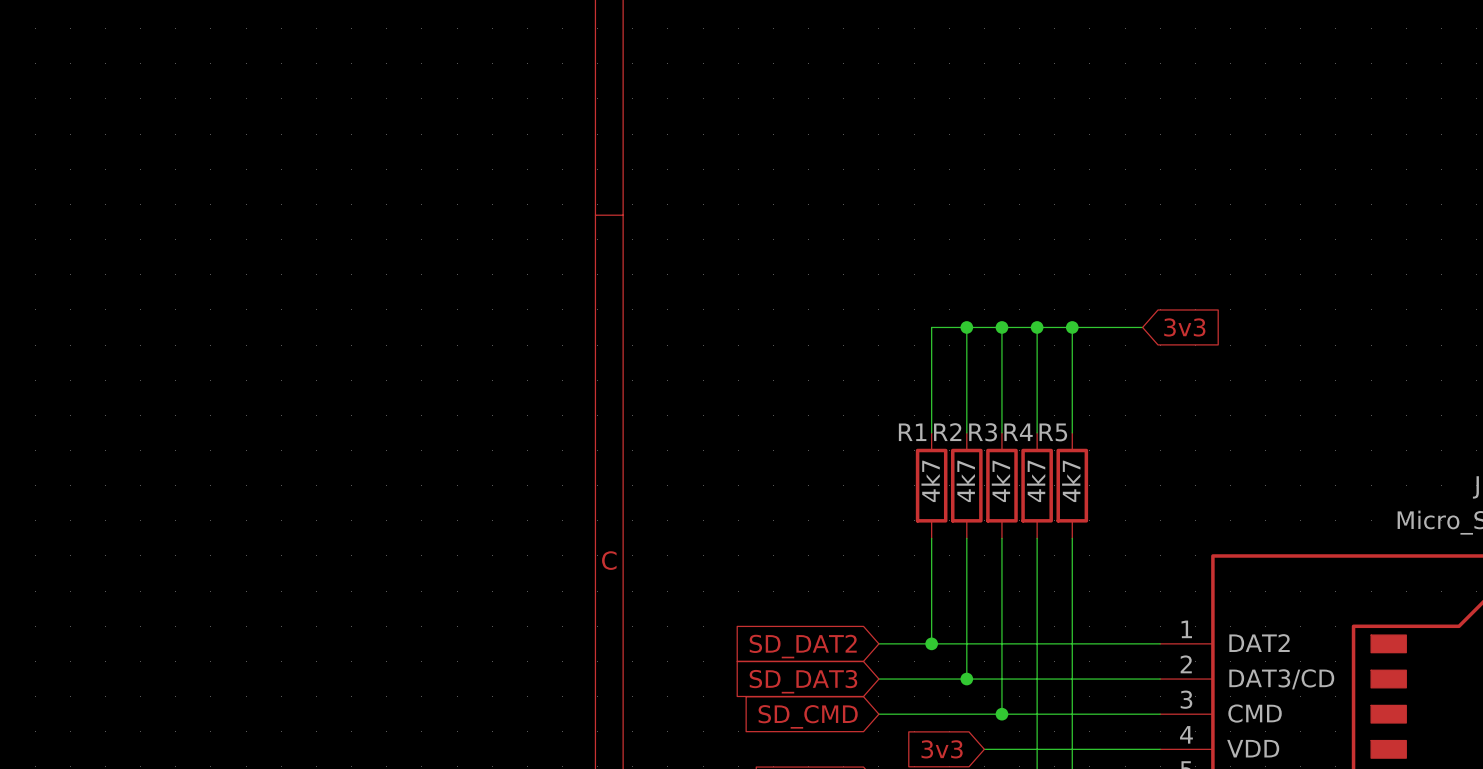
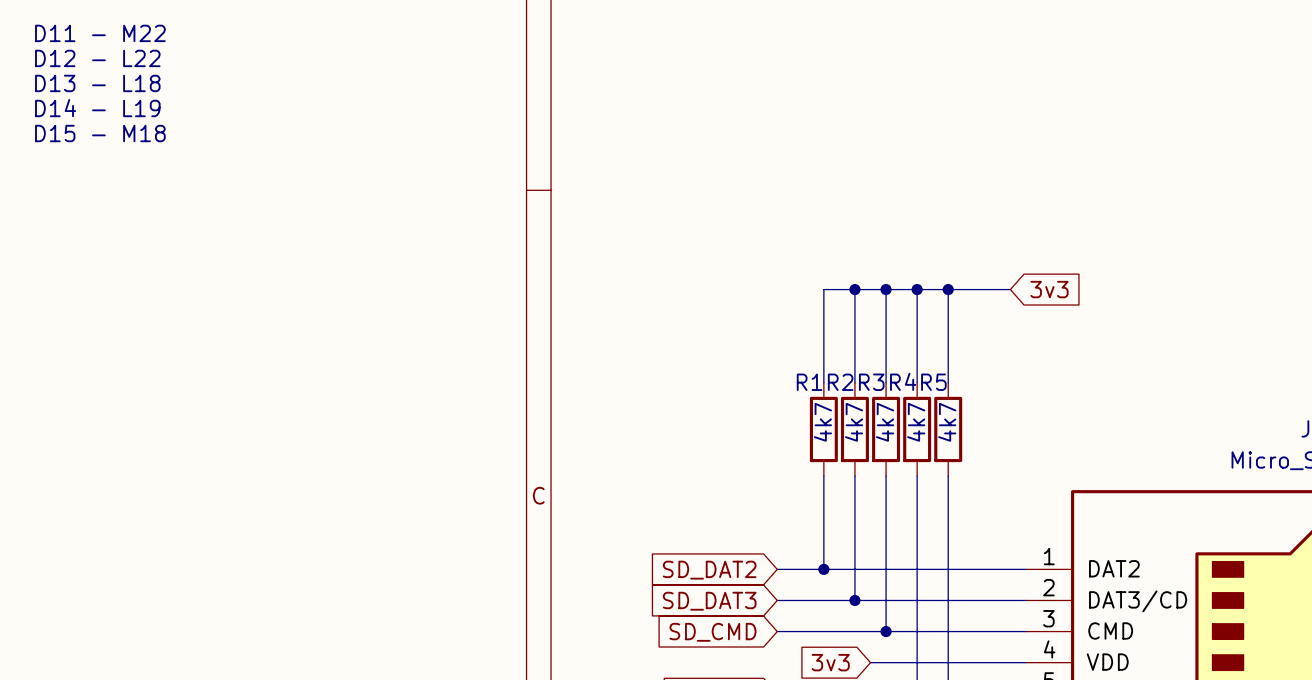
text: none -> D11 - M22 (100, 33)
text: none -> D12 - L22 (97, 58)
text: none -> D13 - L18 (97, 83)
text: none -> D14 - L19 (97, 108)
text: none -> D15 - M18 (100, 133)

